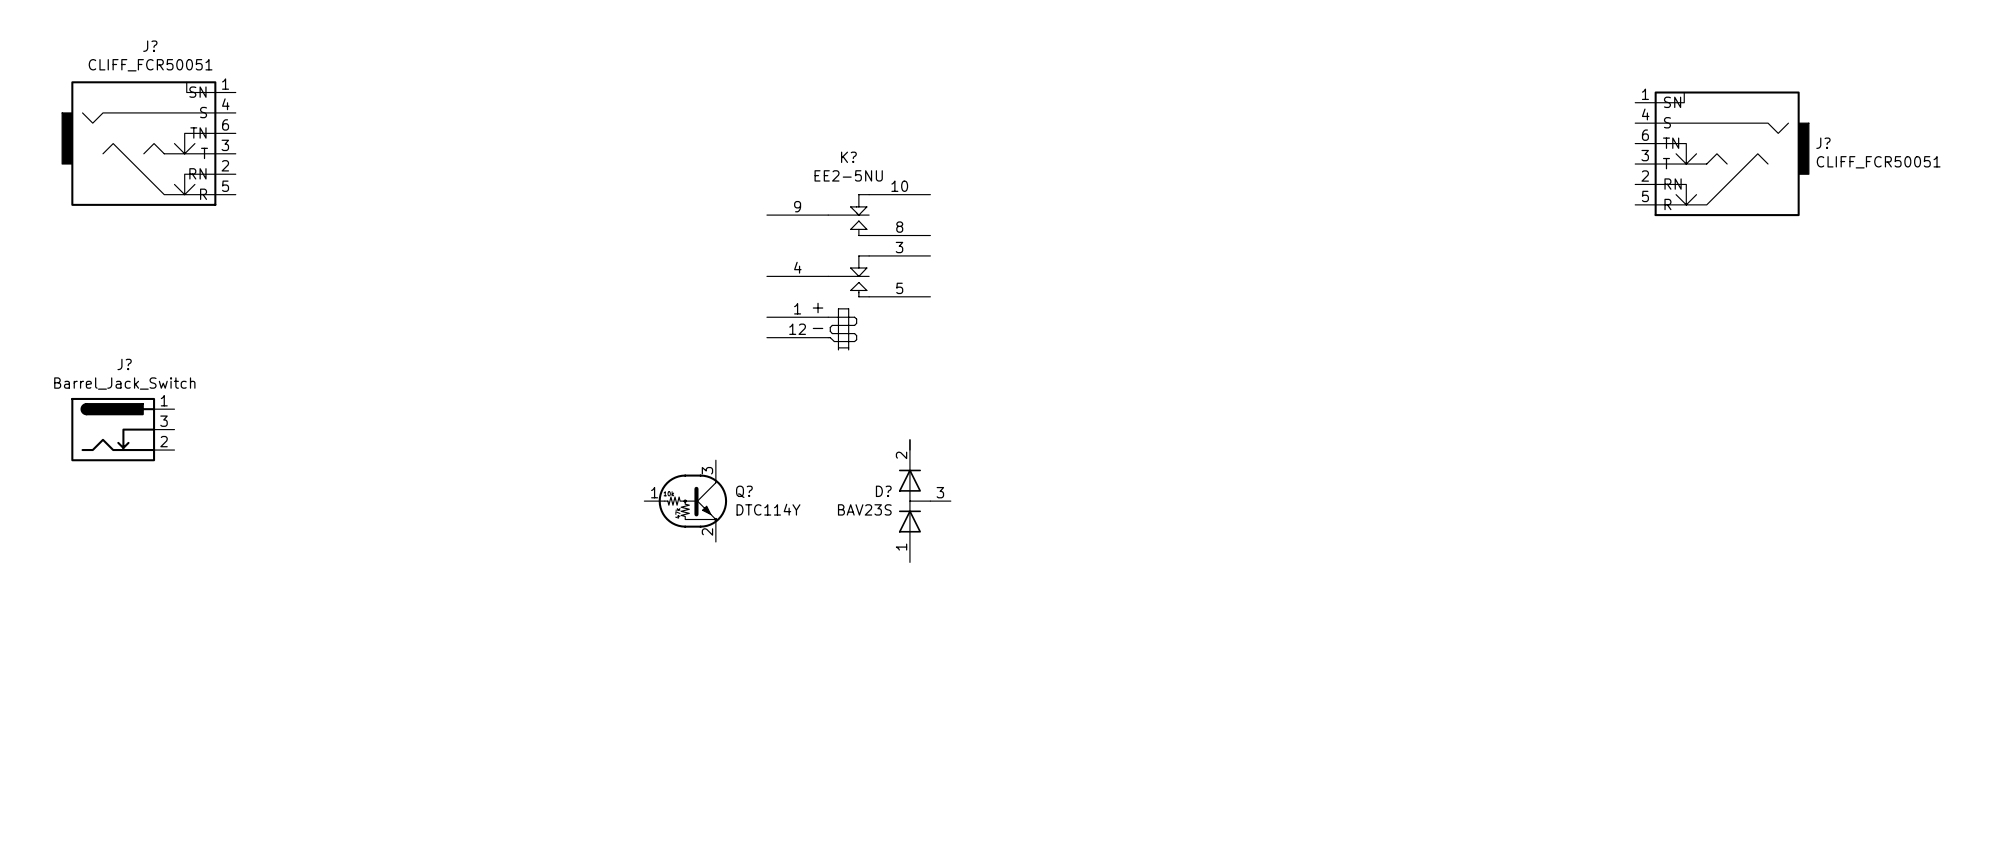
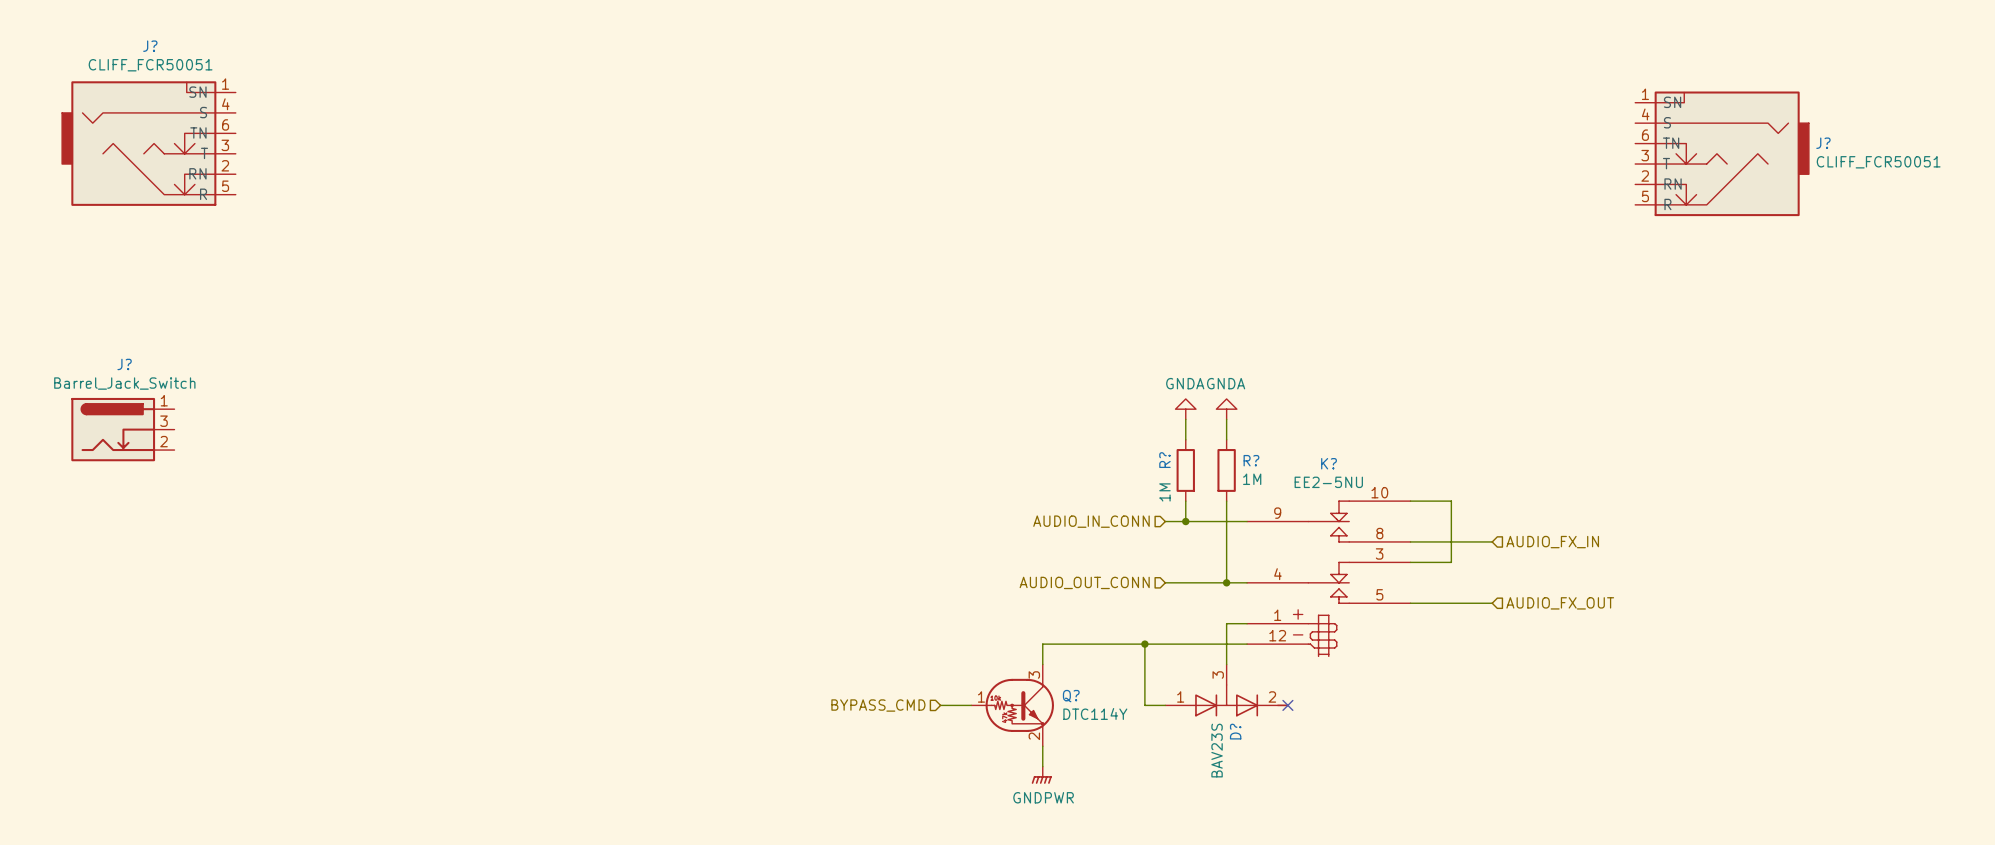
K?: EE2-5NU (848, 272) -> none
power symbol: none -> GNDA (1185, 409)
power symbol: none -> GNDA (1226, 409)
wire: none -> (1185, 419) (1185, 439)
wire: none -> (1226, 419) (1226, 439)
R?: none -> 1M (1185, 470)
R?: none -> 1M (1226, 470)
Q?: DTC114Y (685, 501) -> none
D?: BAV23S (924, 501) -> none
wire: none -> (1185, 501) (1185, 521)
wire: none -> (1226, 501) (1226, 582)
wire: none -> (1410, 501) (1451, 501) (1451, 562) (1410, 562)
hierarchical label: none -> AUDIO_IN_CONN (1091, 521)
wire: none -> (1165, 521) (1247, 521)
junction: none -> (1185, 521)
wire: none -> (1410, 541) (1492, 541)
hierarchical label: none -> AUDIO_FX_IN (1552, 542)
K?: none -> EE2-5NU (1328, 578)
hierarchical label: none -> AUDIO_OUT_CONN (1084, 582)
wire: none -> (1165, 582) (1247, 582)
junction: none -> (1226, 582)
wire: none -> (1410, 603) (1492, 603)
hierarchical label: none -> AUDIO_FX_OUT (1560, 603)
wire: none -> (1247, 623) (1226, 623) (1226, 664)
wire: none -> (1144, 644) (1144, 705) (1165, 705)
junction: none -> (1144, 644)
wire: none -> (1247, 644) (1042, 644) (1042, 664)
D?: none -> BAV23S (1226, 690)
hierarchical label: none -> BYPASS_CMD (878, 705)
wire: none -> (940, 705) (971, 705)
Q?: none -> DTC114Y (1012, 705)
no-connect mark: none -> (1287, 705)
wire: none -> (1042, 746) (1042, 766)
power symbol: none -> GNDPWR (1041, 775)

